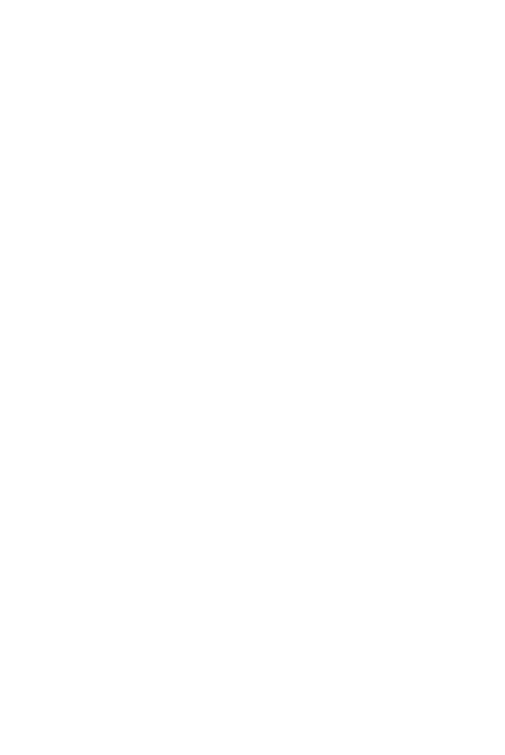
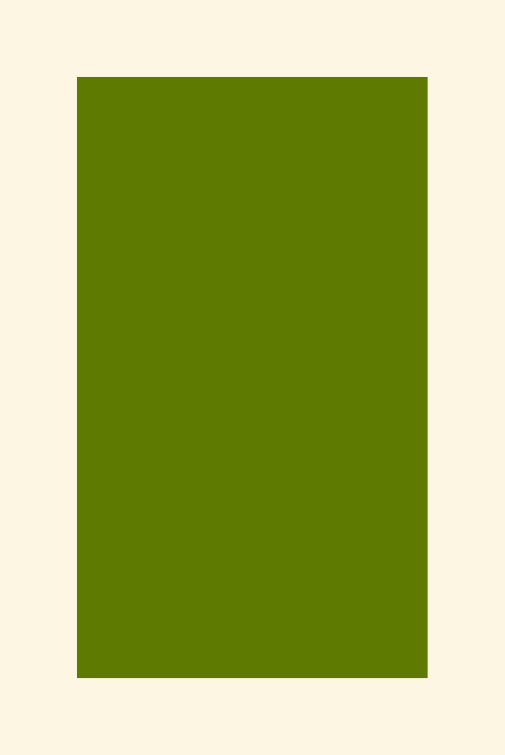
drawing: none -> [76, 76, 428, 679]

